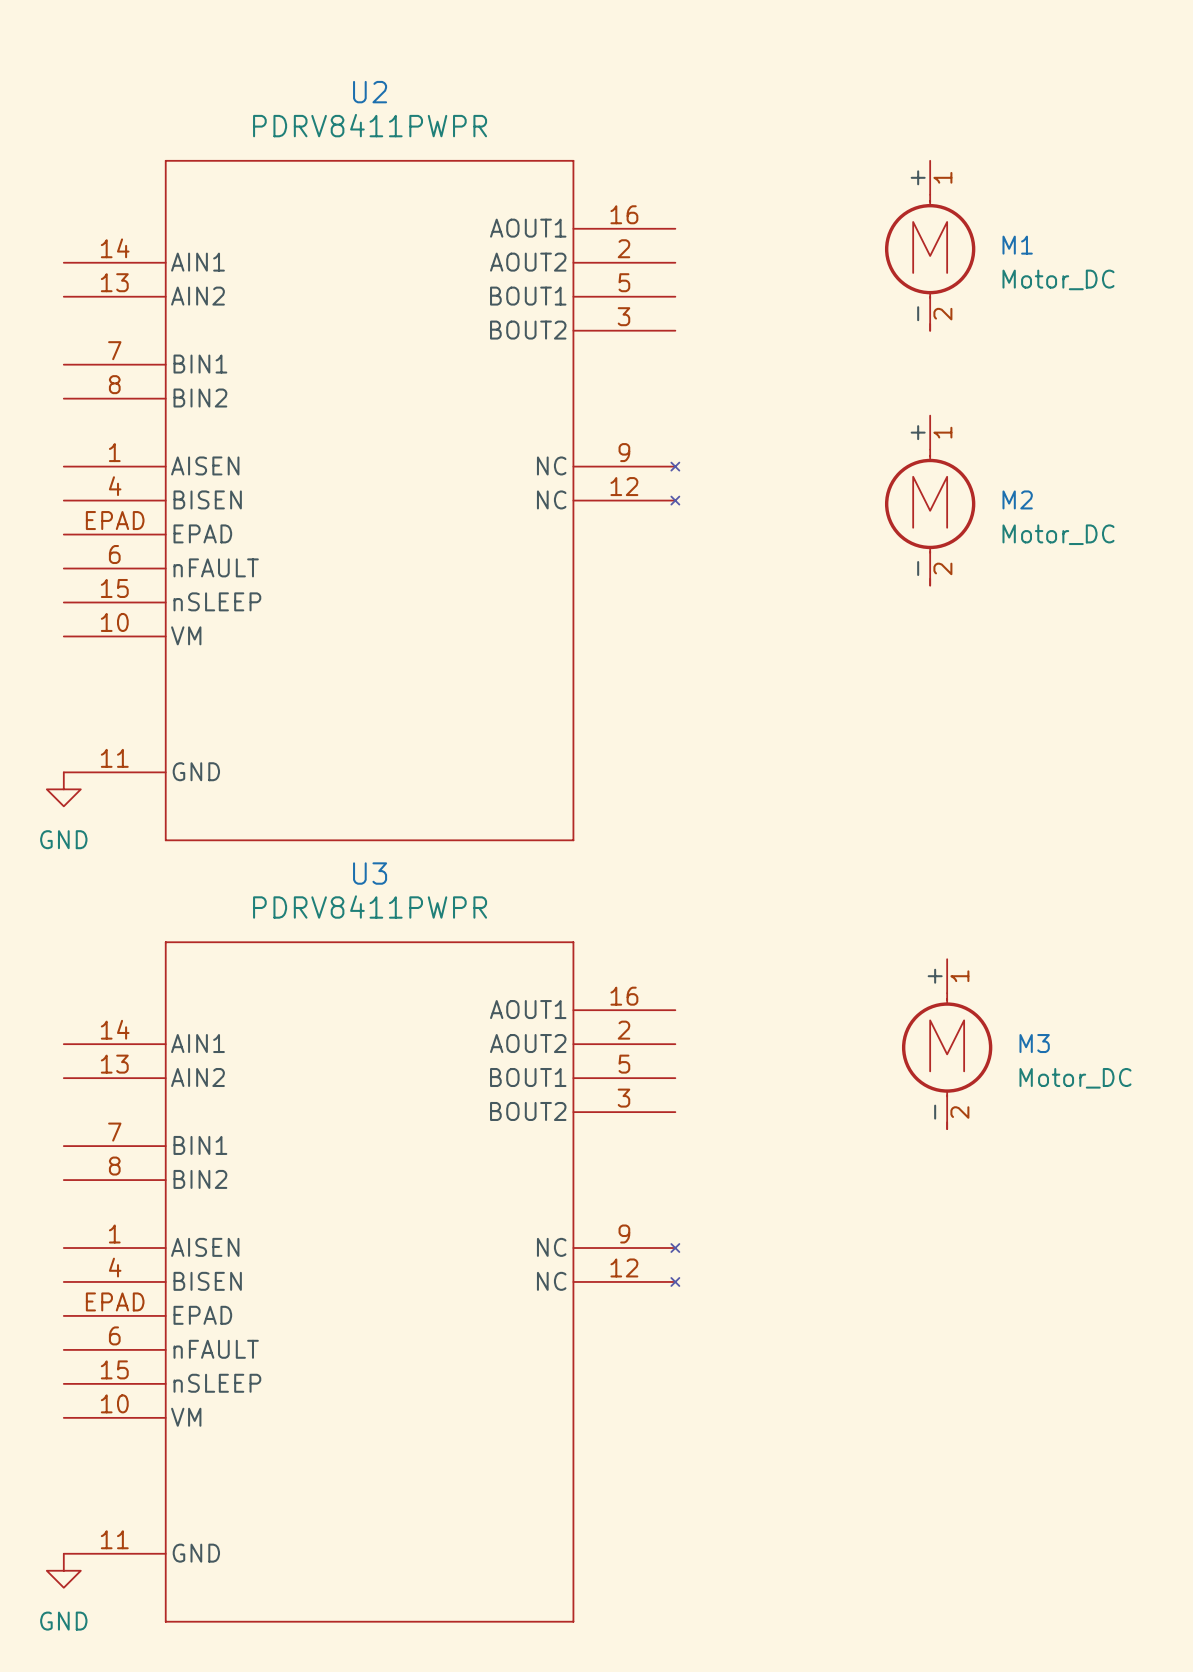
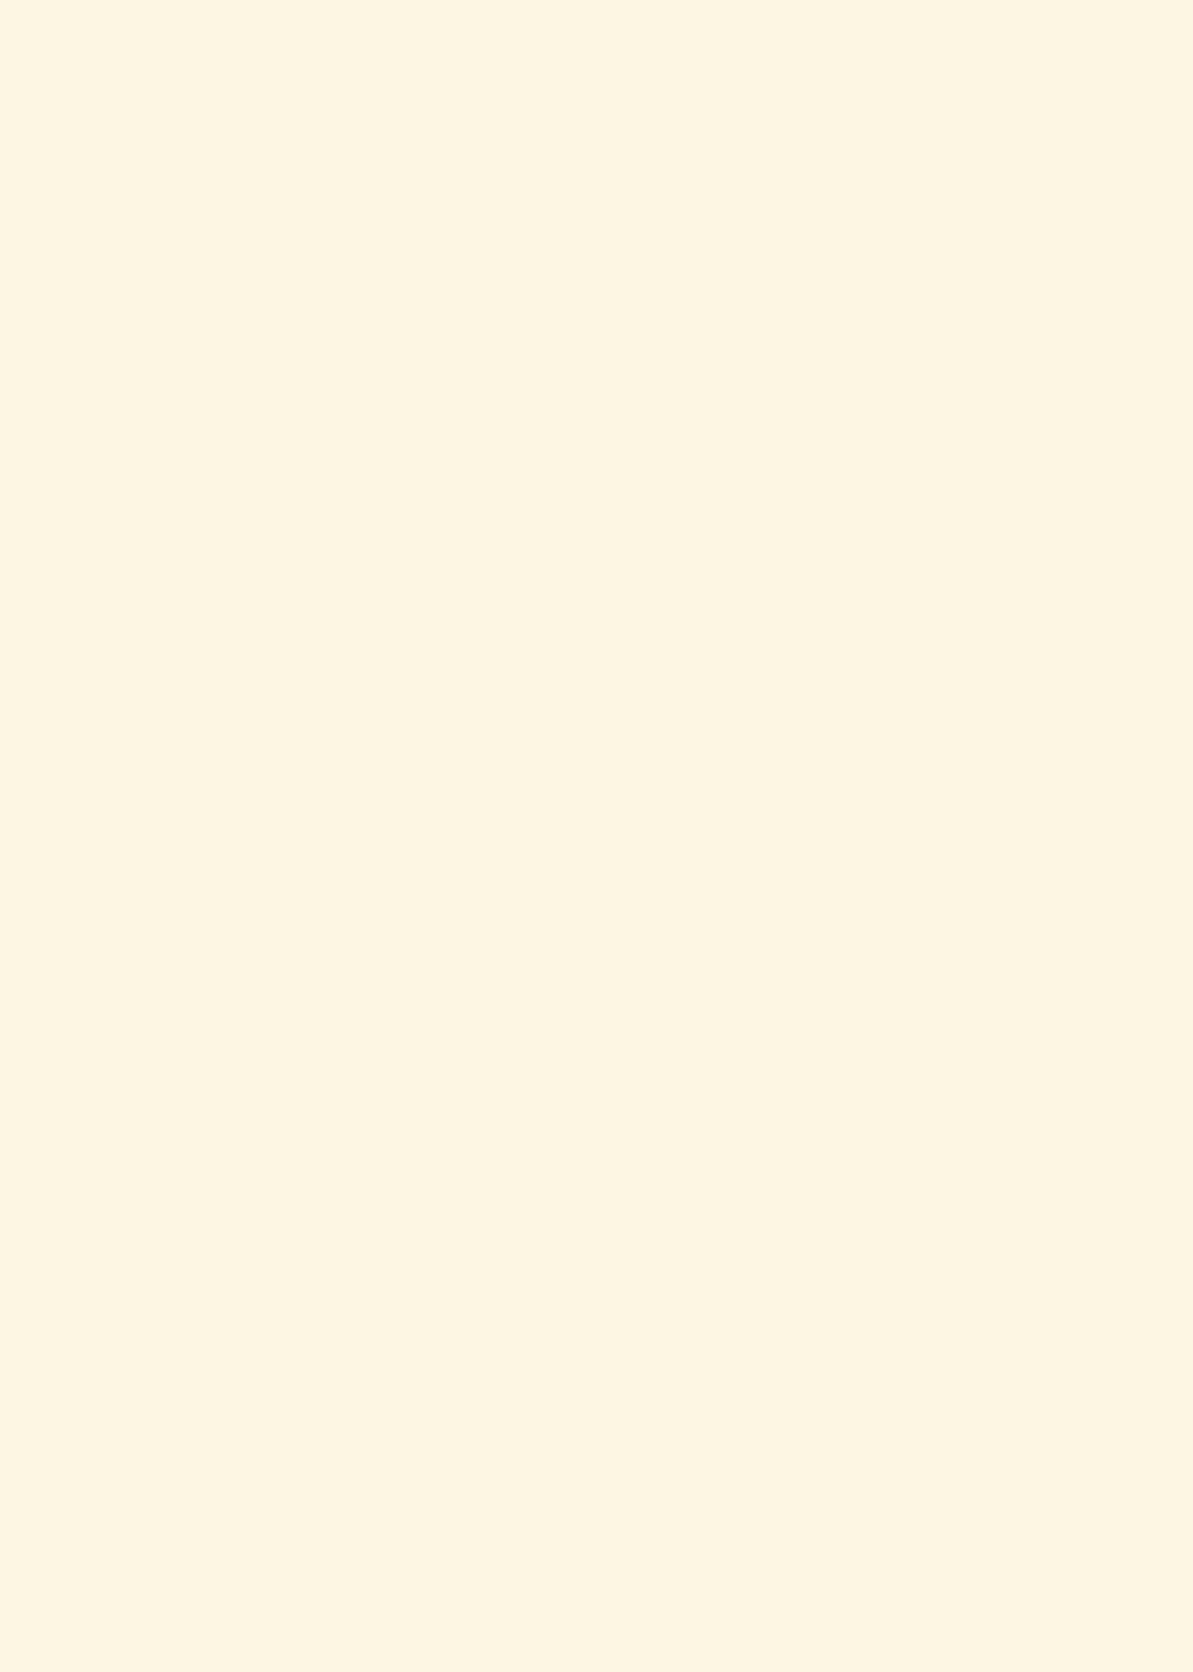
M1: Motor_DC (930, 245) -> none
U2: PDRV8411PWPR (371, 500) -> none
M2: Motor_DC (930, 500) -> none
power symbol: GND (63, 789) -> none
M3: Motor_DC (947, 1044) -> none
U3: PDRV8411PWPR (371, 1281) -> none
power symbol: GND (63, 1570) -> none

